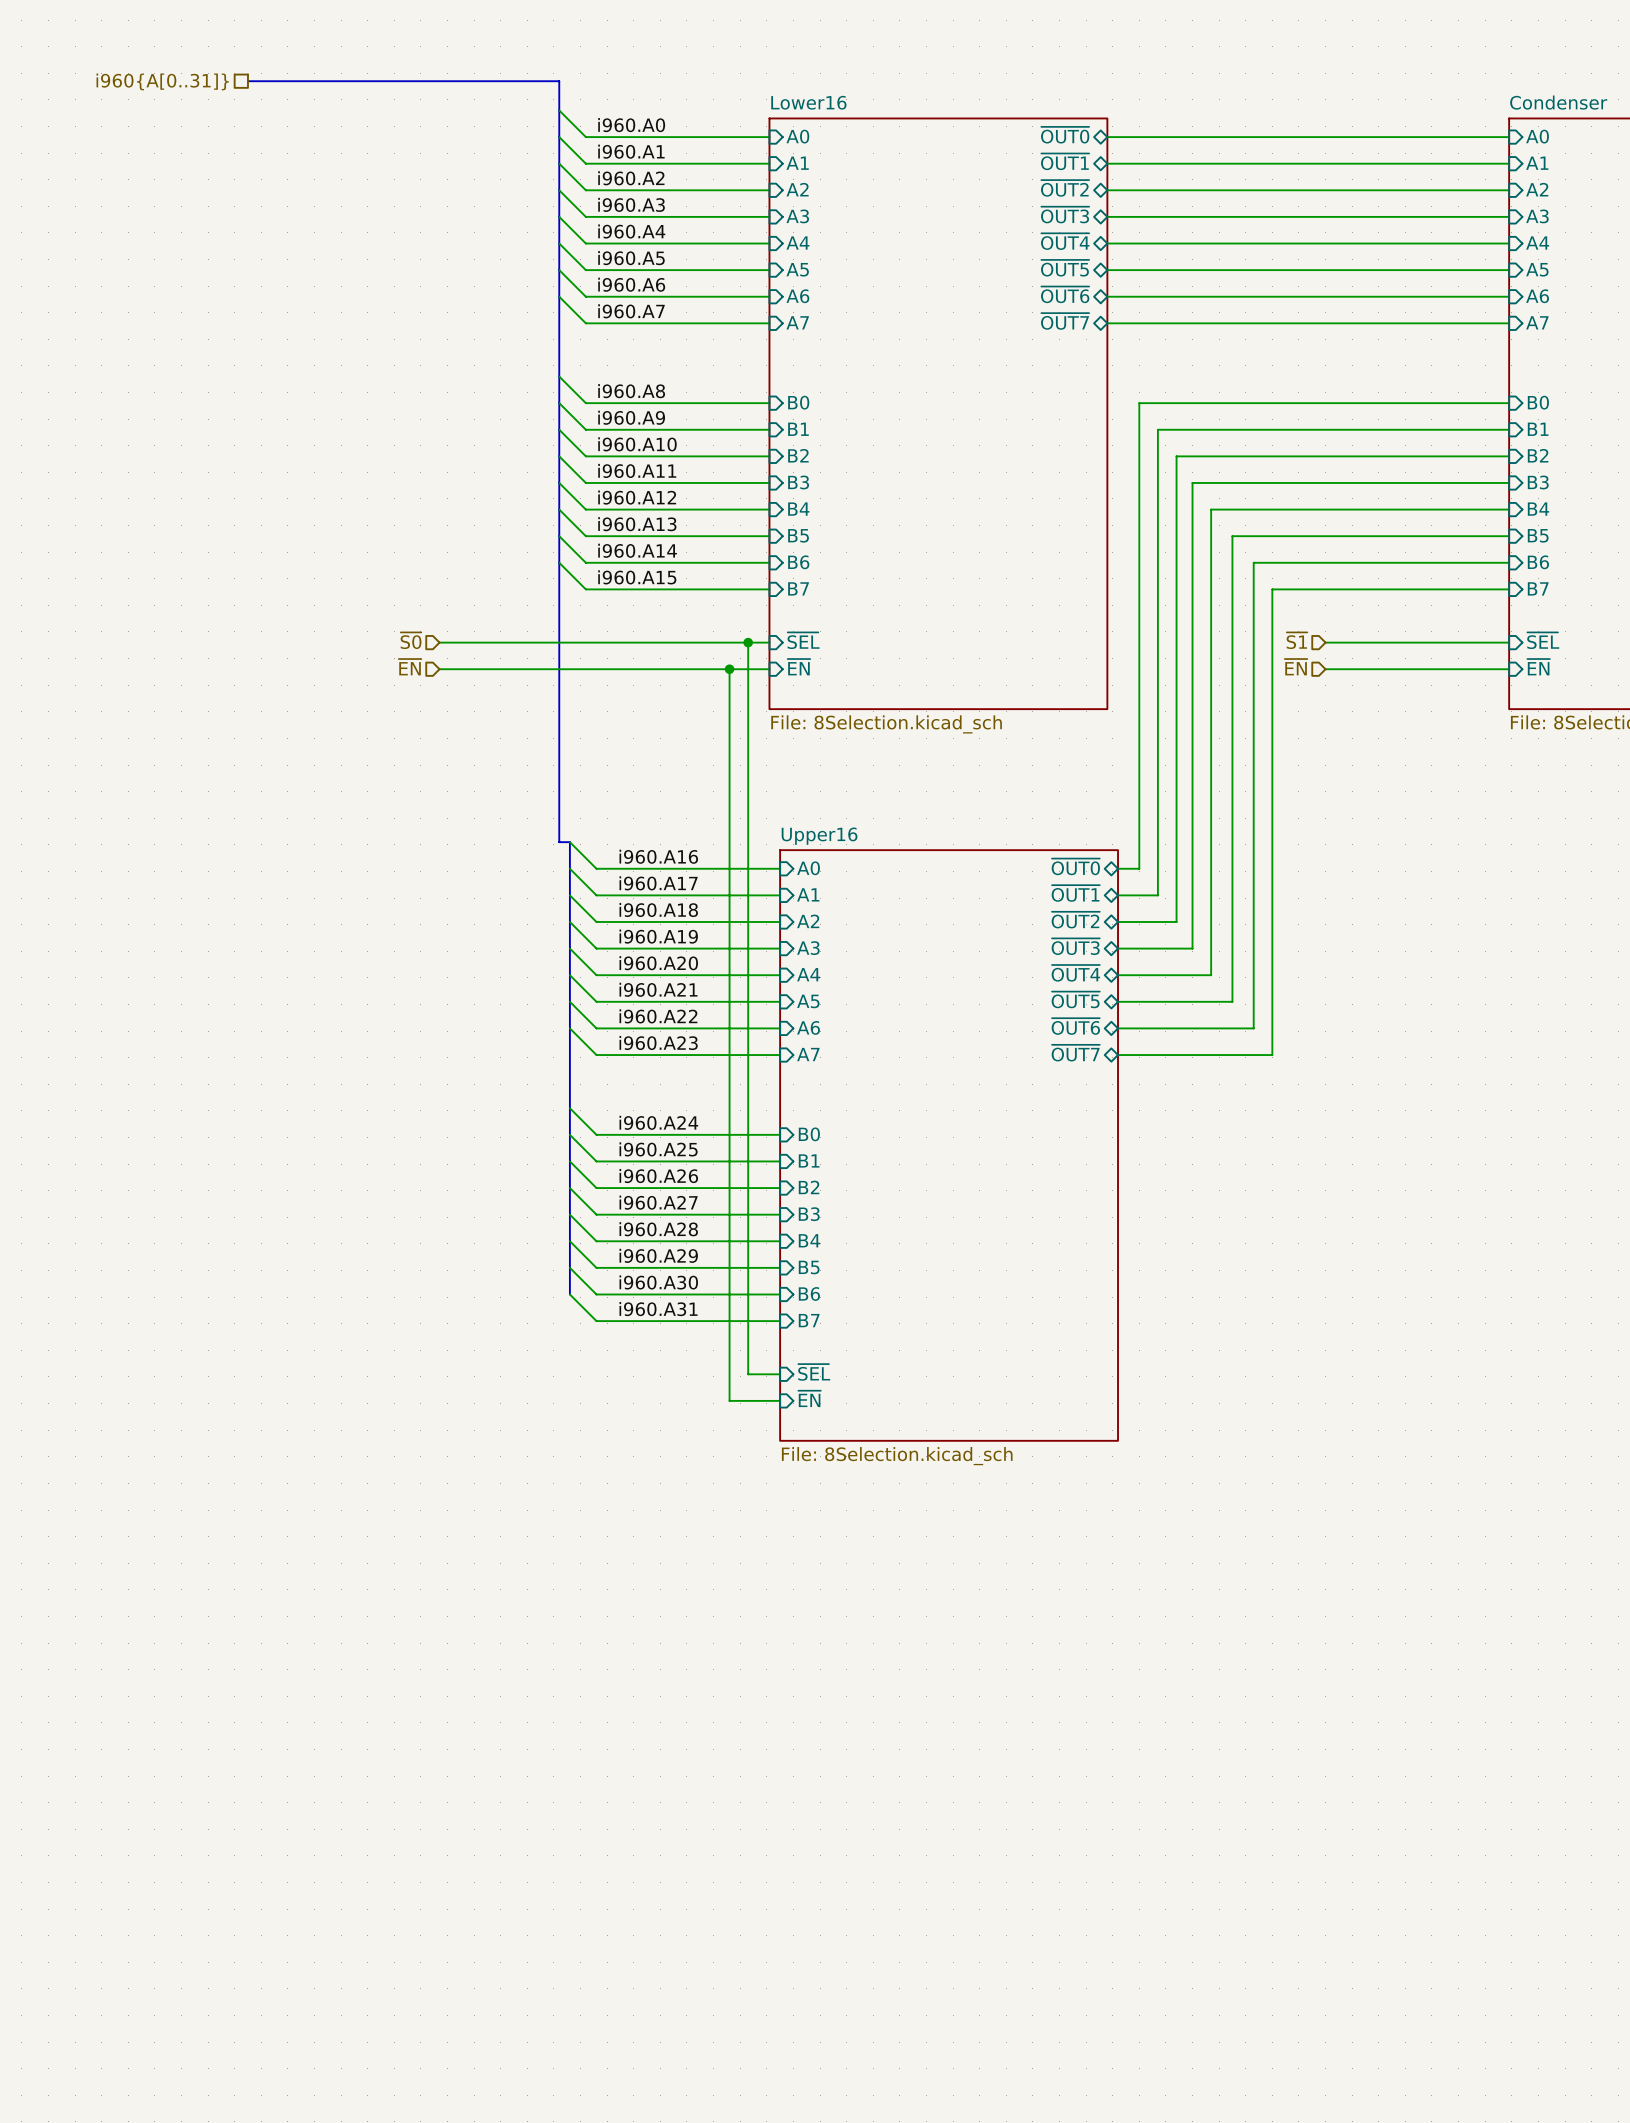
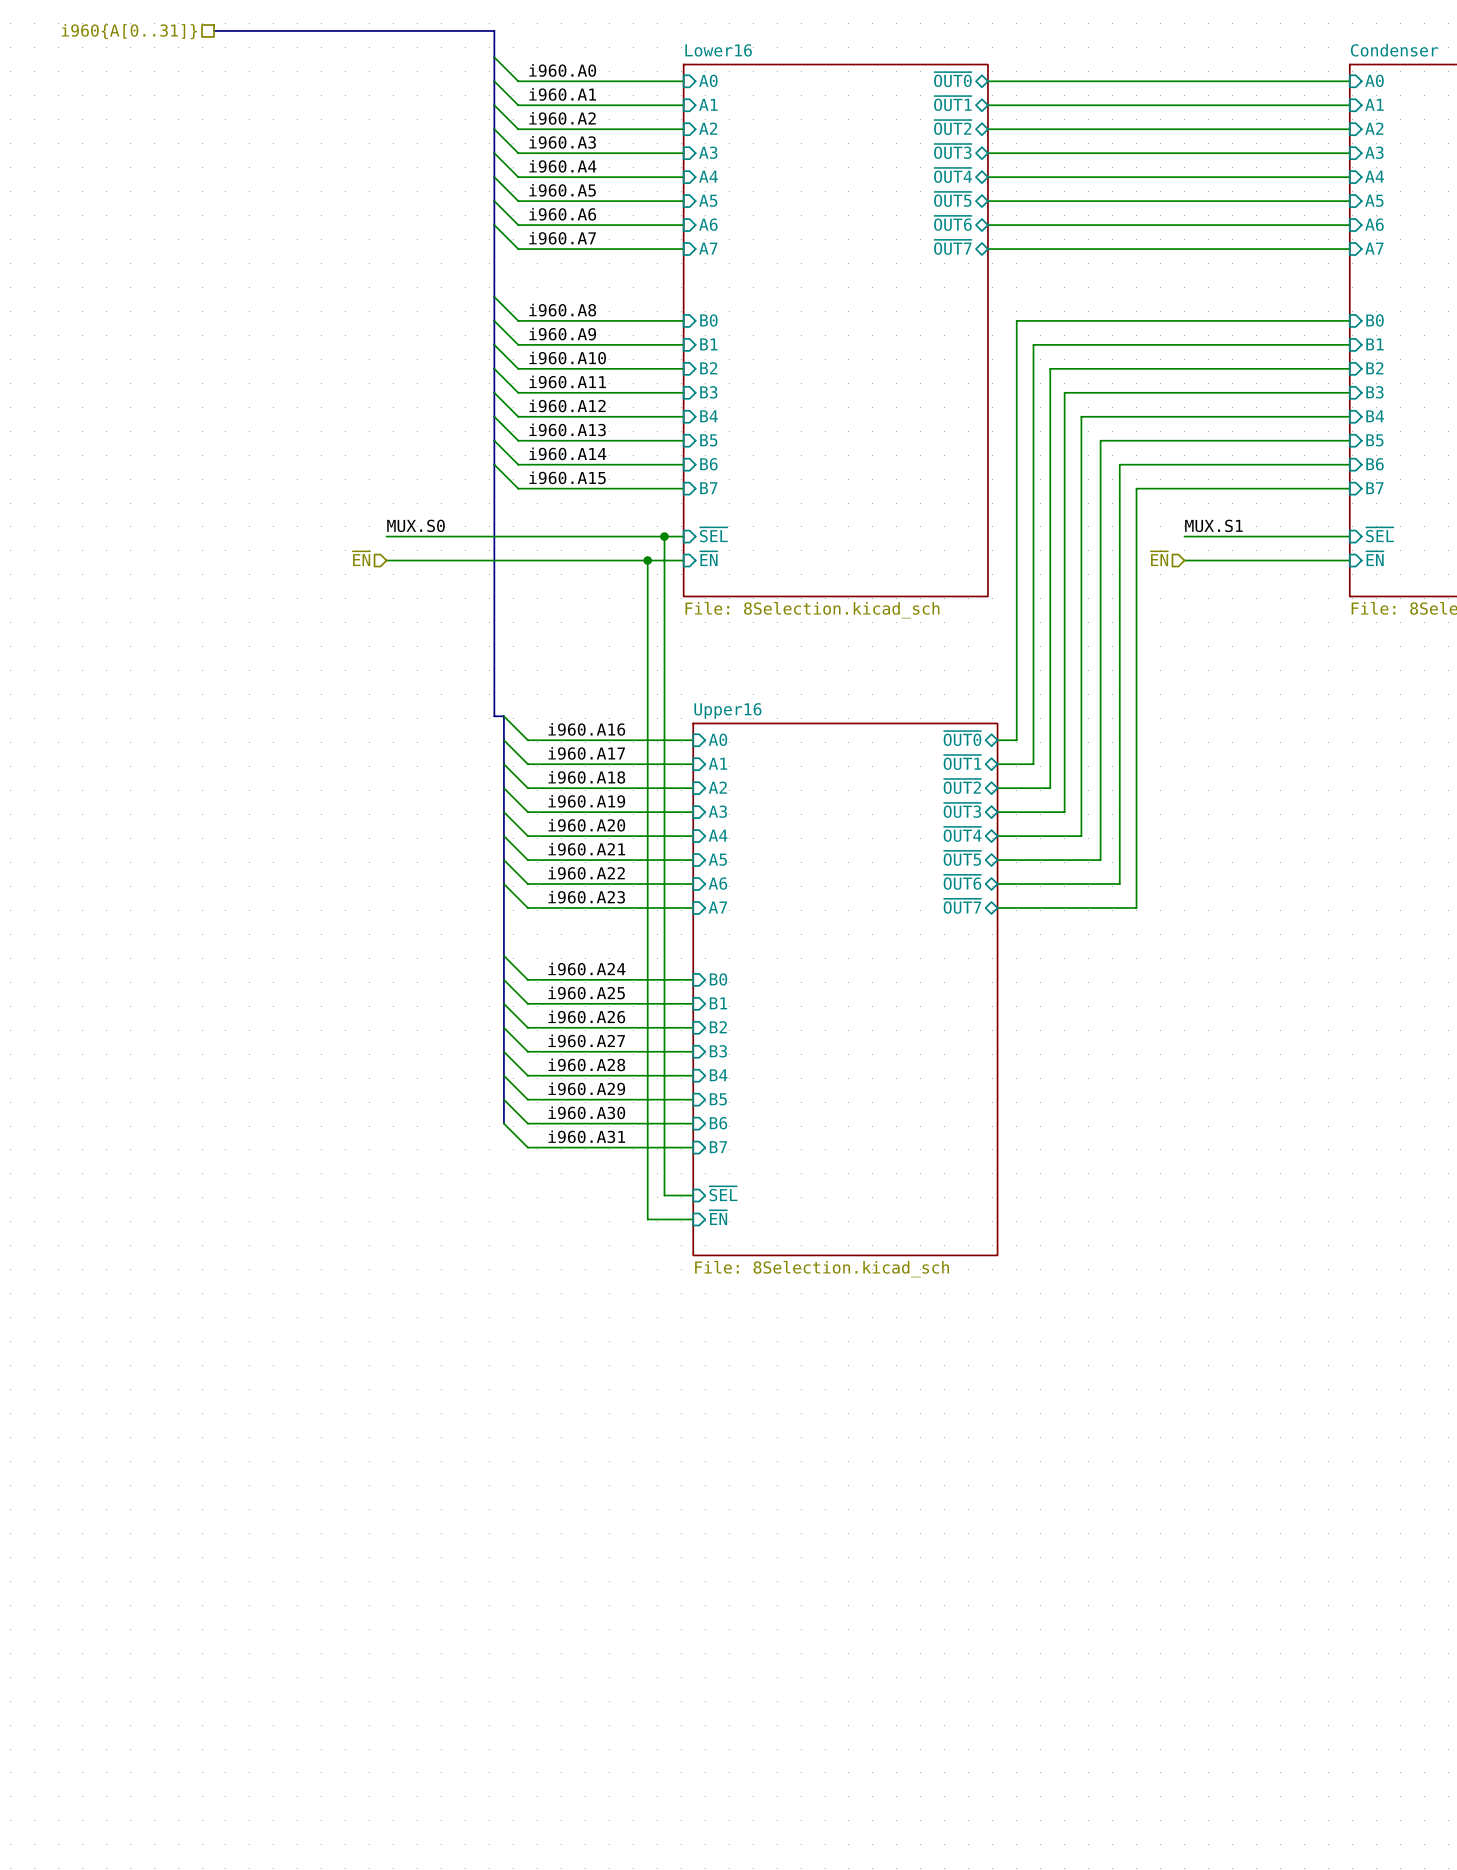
label: none -> MUX.S0 (416, 525)
label: none -> MUX.S1 (1213, 525)
hierarchical label: ~{S0} (411, 640) -> none
hierarchical label: ~{S1} (1296, 640) -> none

